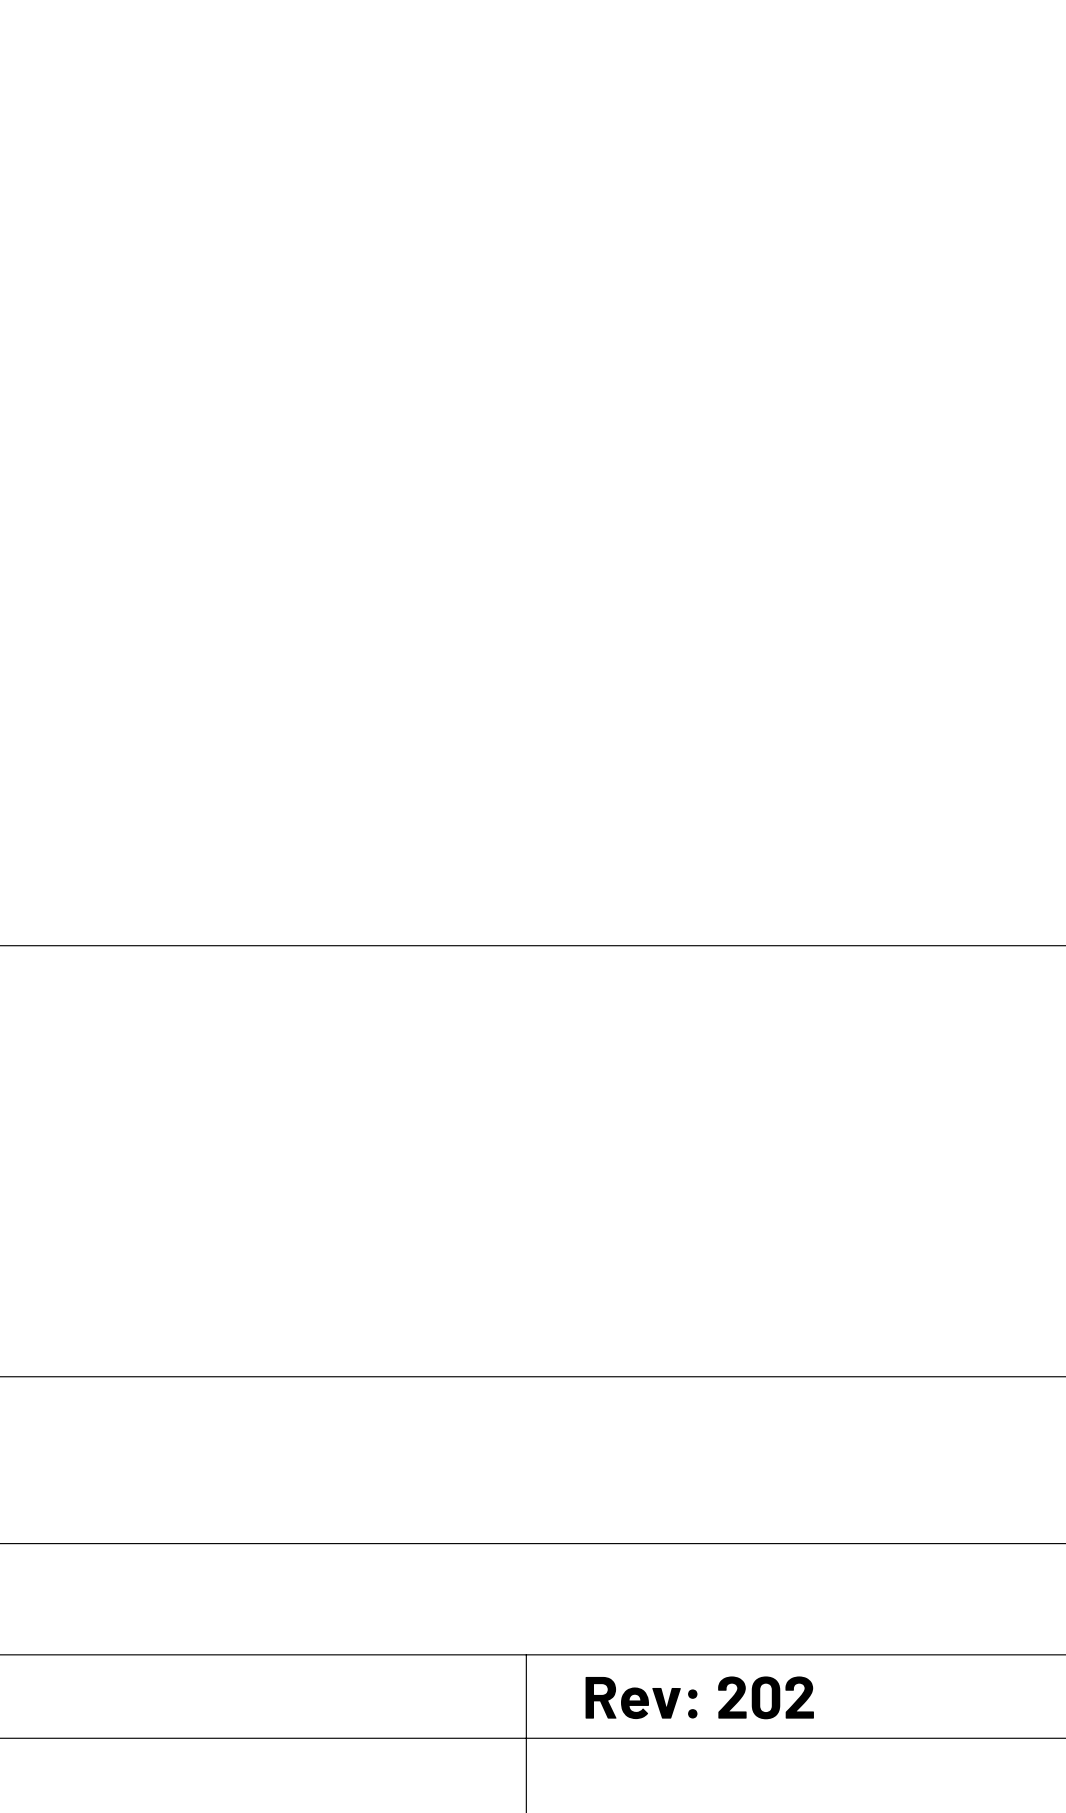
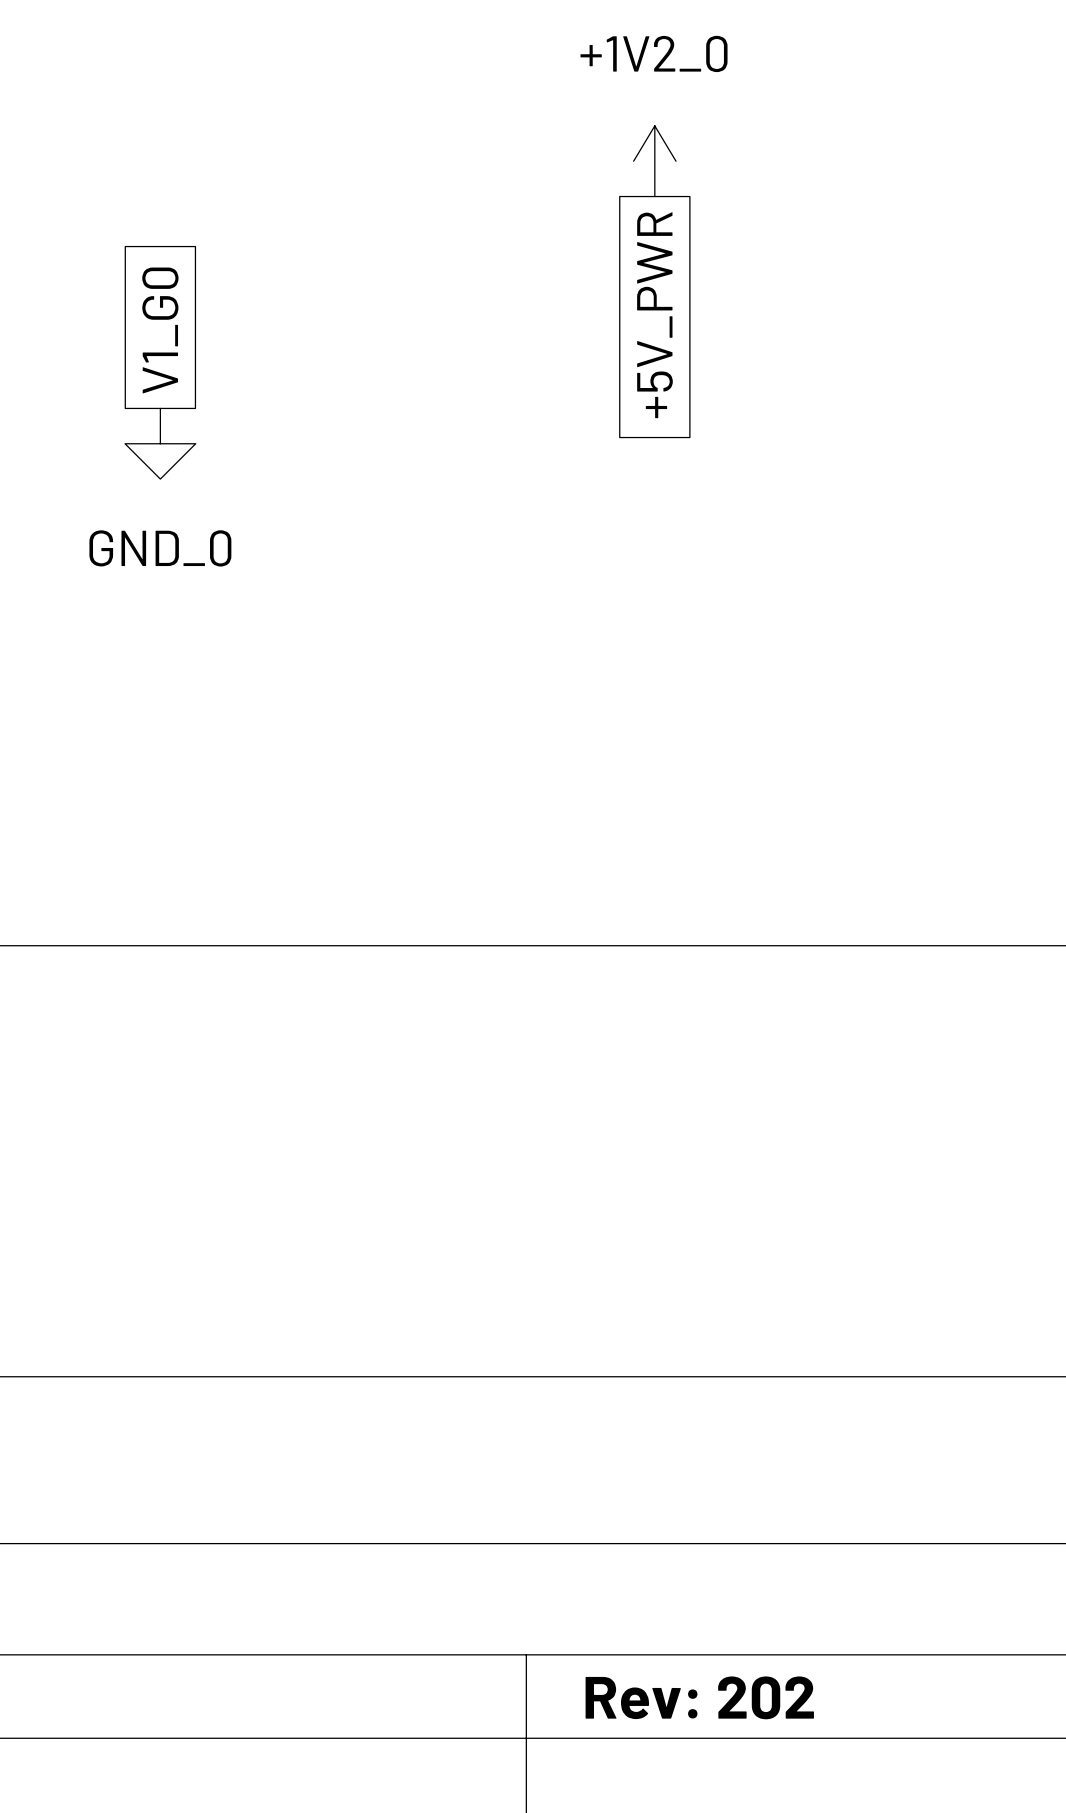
power symbol: none -> +1V2_0 (654, 161)
global label: none -> +5V_PWR (654, 315)
global label: none -> V1_G0 (160, 330)
power symbol: none -> GND_0 (160, 443)

